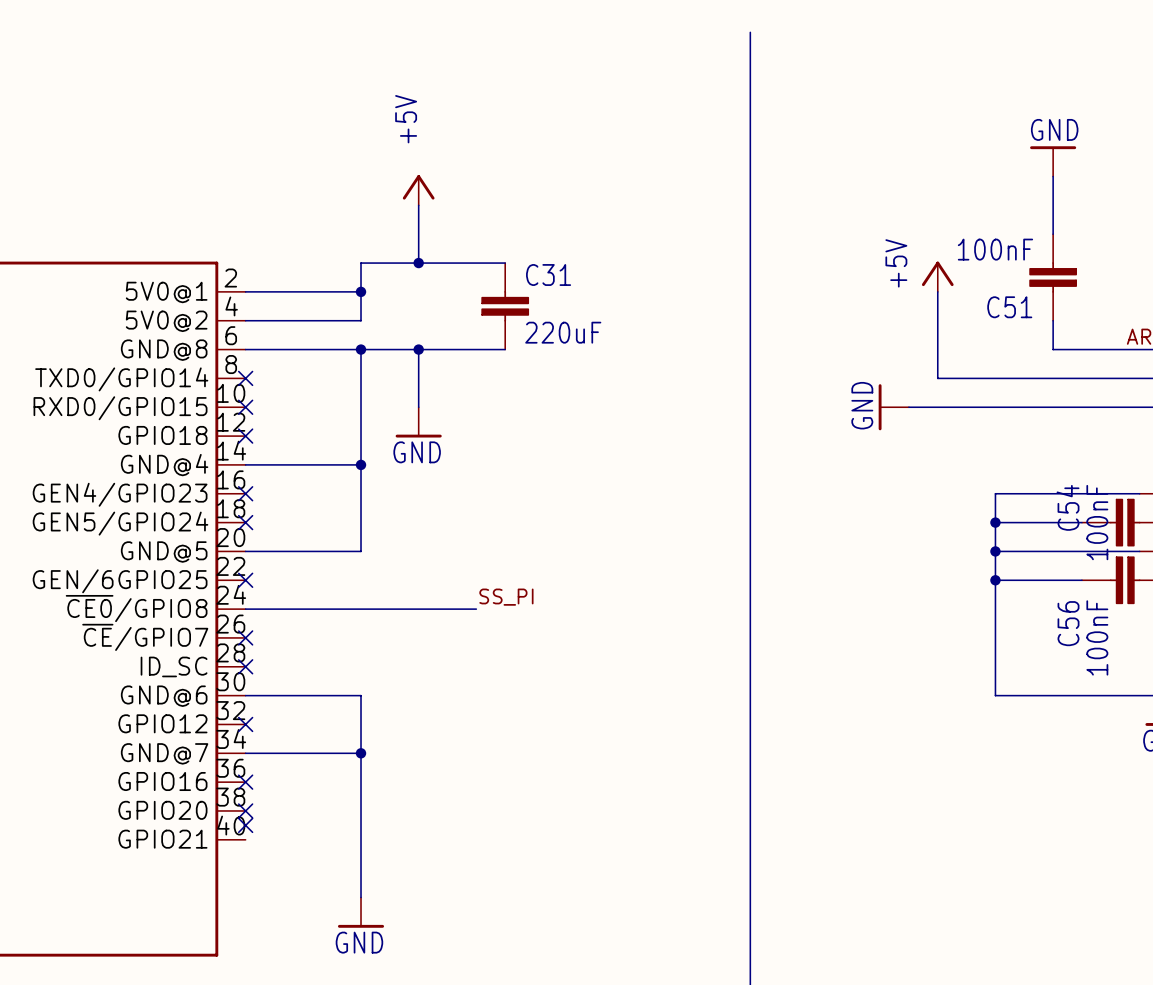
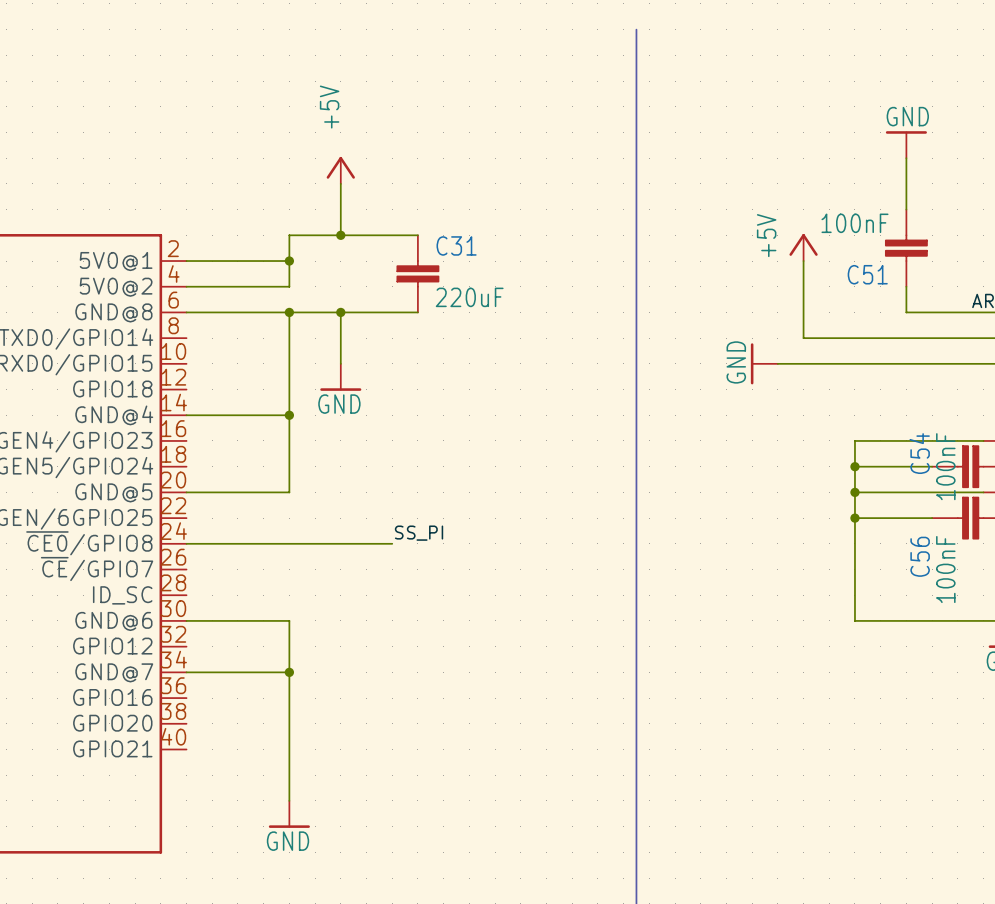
no-connect mark: (245, 378) -> none
no-connect mark: (245, 407) -> none
no-connect mark: (245, 436) -> none
no-connect mark: (245, 493) -> none
no-connect mark: (245, 522) -> none
no-connect mark: (245, 580) -> none
no-connect mark: (245, 637) -> none
no-connect mark: (245, 666) -> none
no-connect mark: (245, 724) -> none
no-connect mark: (245, 782) -> none
no-connect mark: (245, 810) -> none
no-connect mark: (245, 825) -> none

